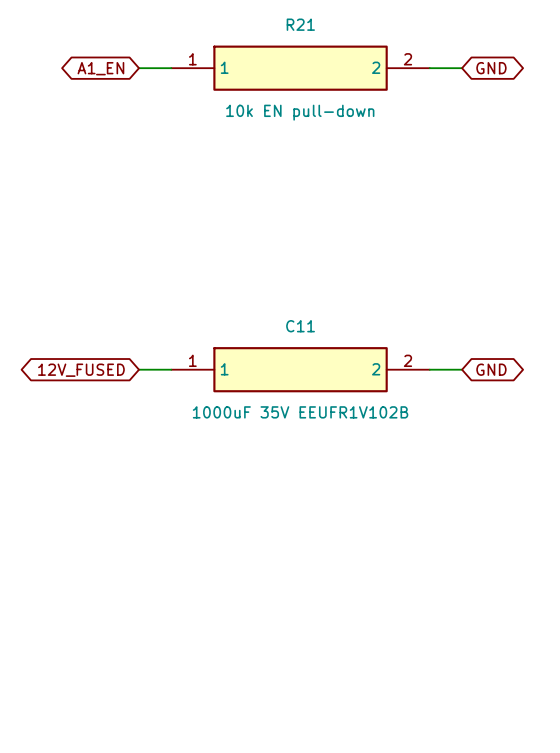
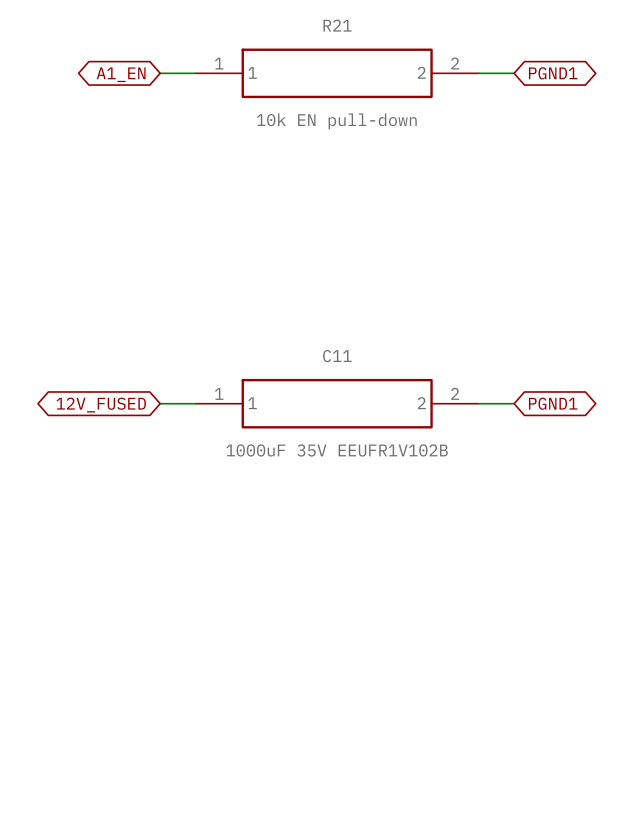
global label: GND (491, 68) -> PGND1 (553, 73)
global label: GND (491, 369) -> PGND1 (553, 403)

